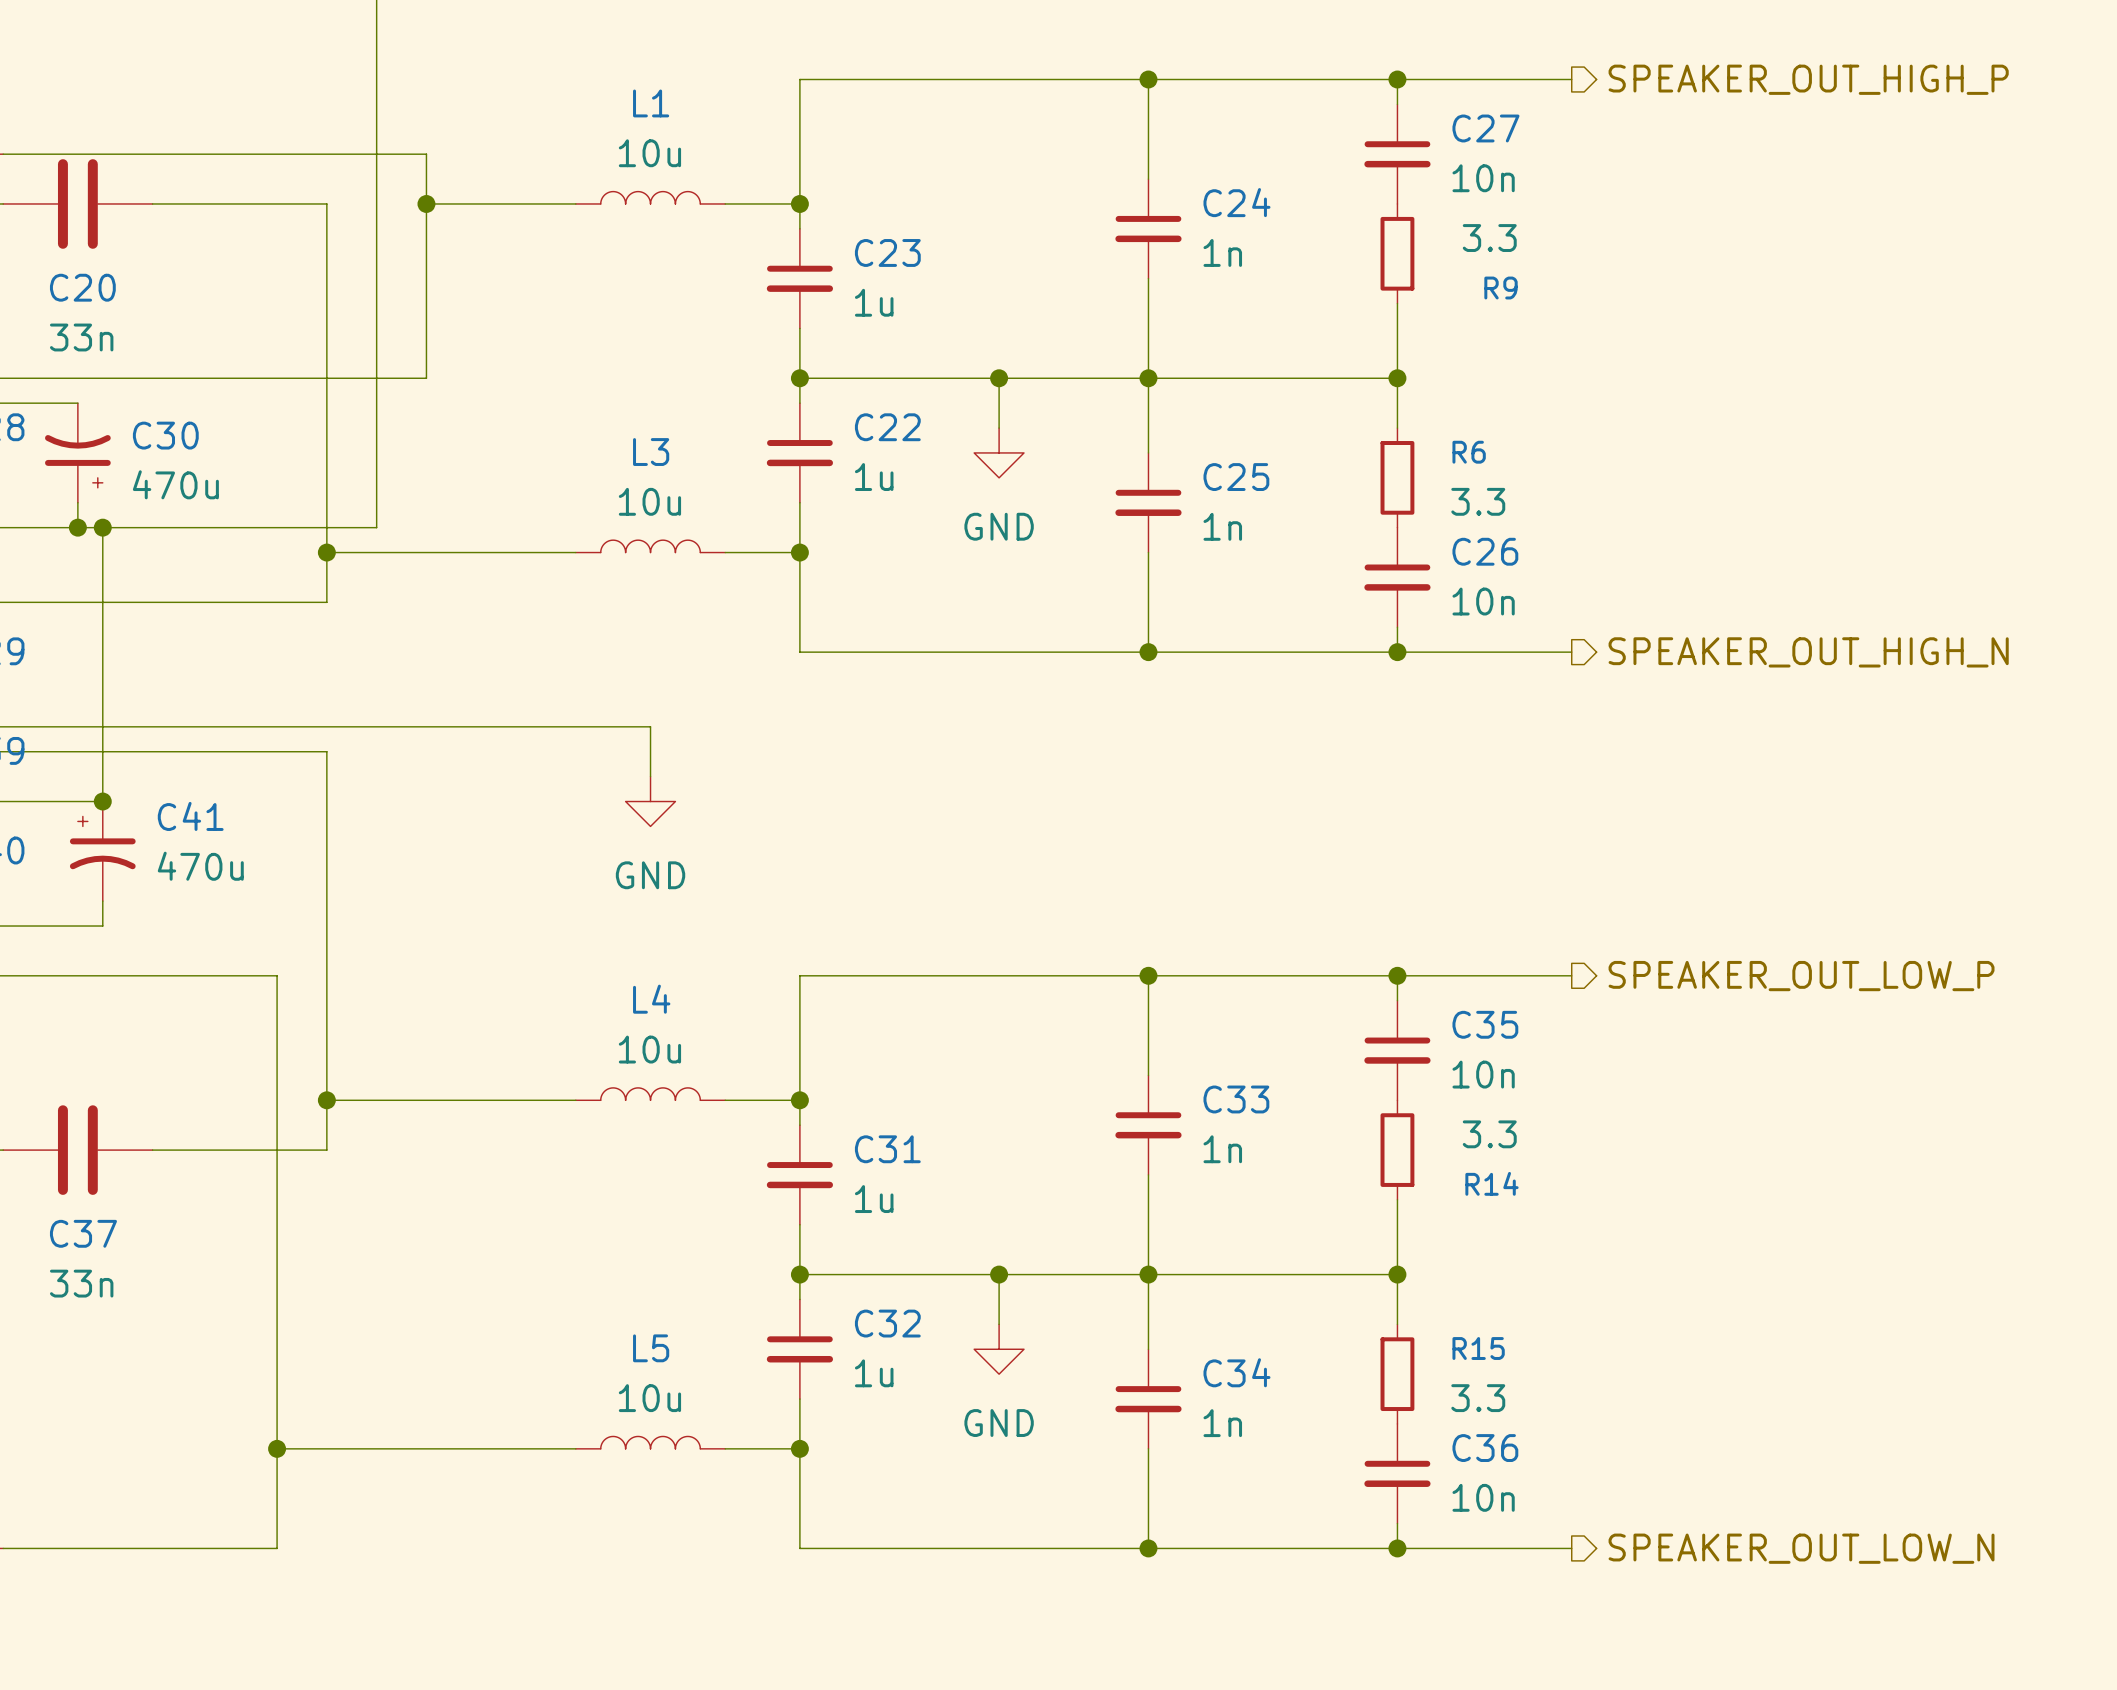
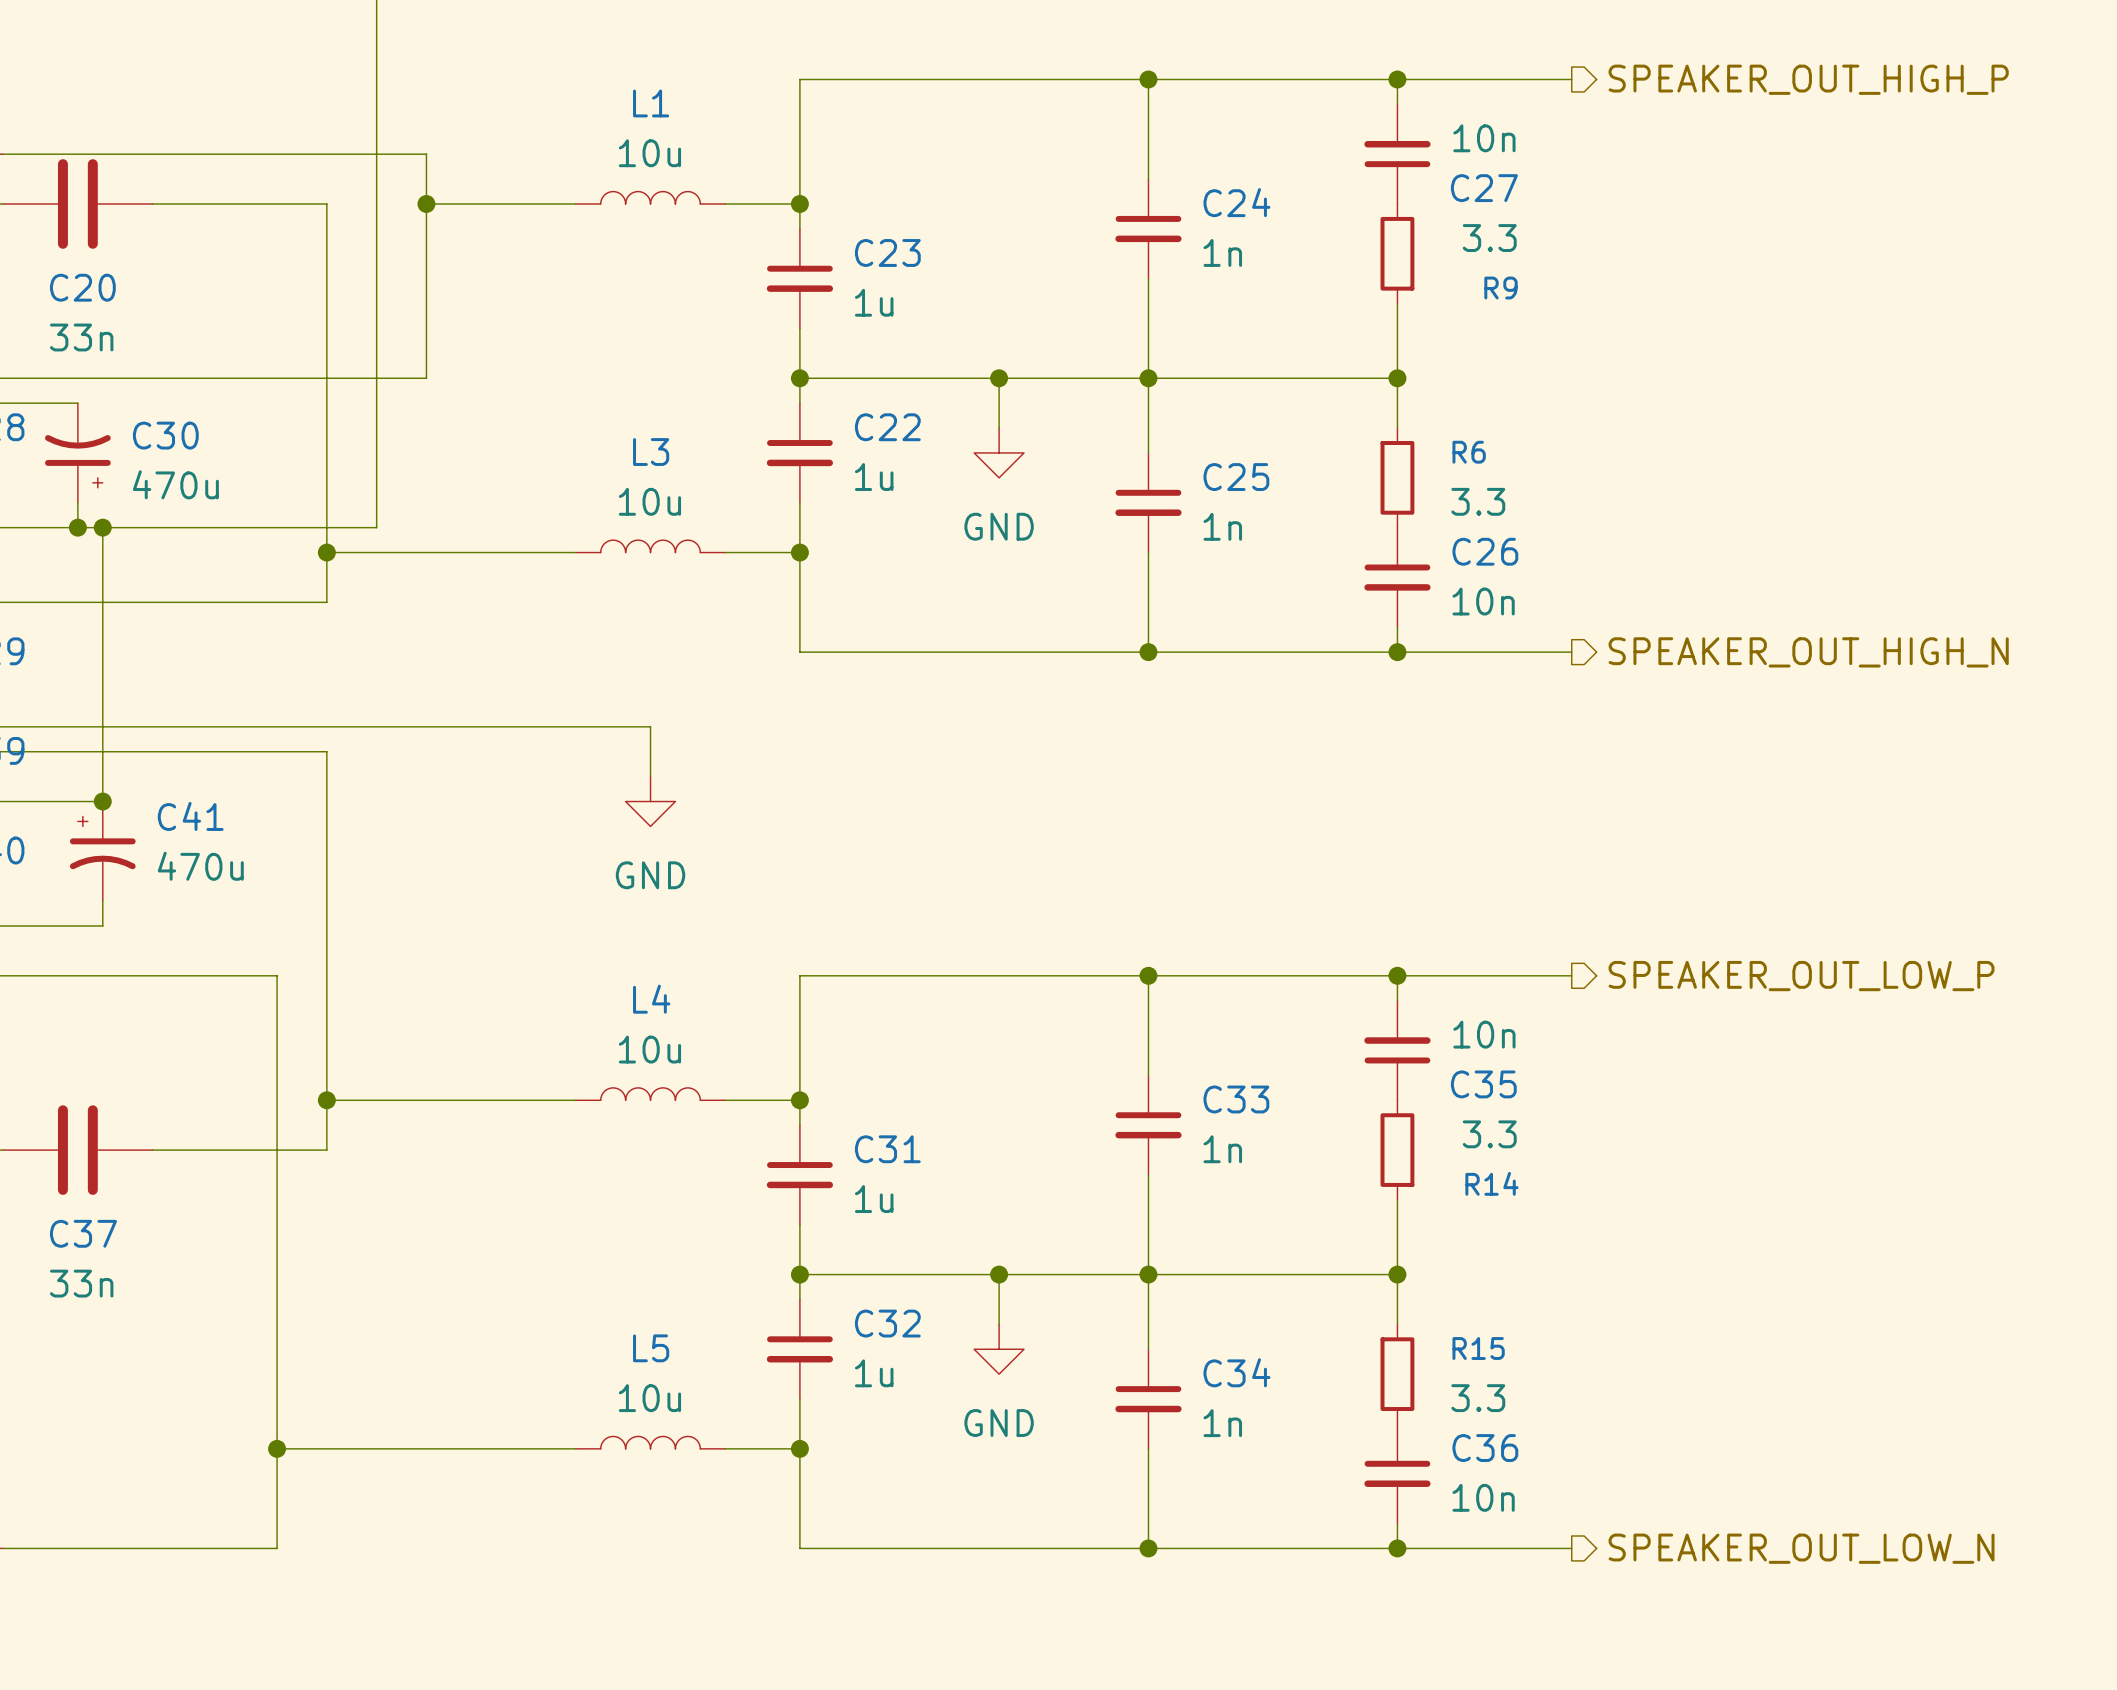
C27 name position: C27 (1485, 128) -> C27 (1484, 188)
C27 rotation: 0° (1397, 154) -> 180° (1397, 154)
C27 value position: 10n (1483, 178) -> 10n (1484, 138)
C35 name position: C35 (1485, 1024) -> C35 (1483, 1084)
C35 rotation: 0° (1397, 1050) -> 180° (1397, 1050)
C35 value position: 10n (1483, 1074) -> 10n (1484, 1034)

